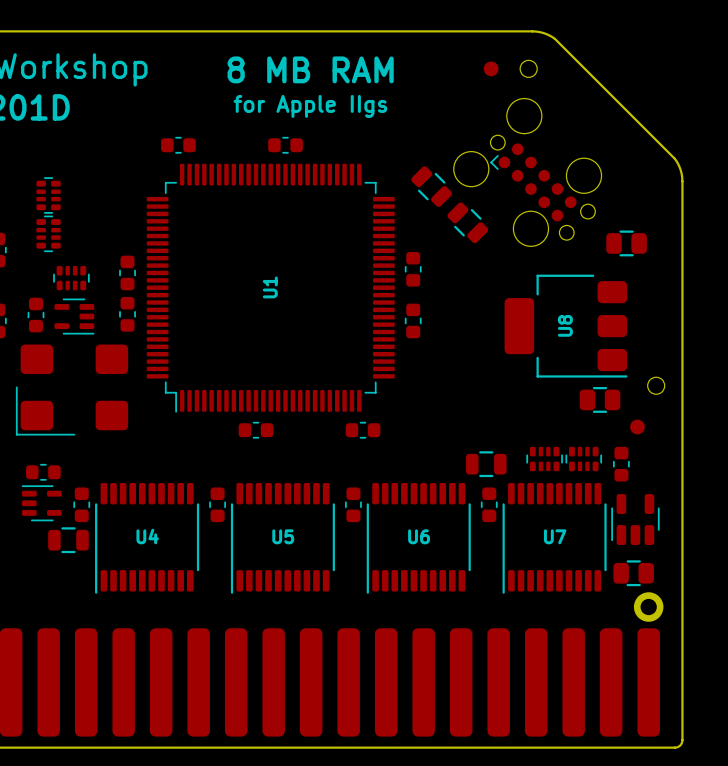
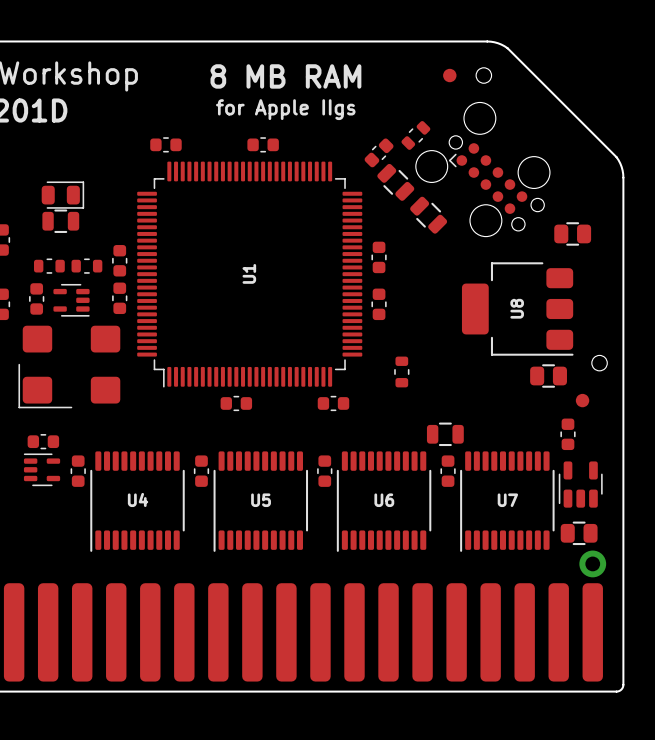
part: none -> (415, 135)
part: none -> (379, 152)
part: (48, 195) -> none
part: none -> (62, 195)
part footprint: [36, 215, 61, 253] -> [42, 209, 80, 233]
part: none -> (49, 266)
part: (71, 278) -> none
part: none -> (86, 266)
part: none -> (401, 371)
part: (544, 459) -> none
part: (583, 459) -> none
part: (68, 540) -> none

